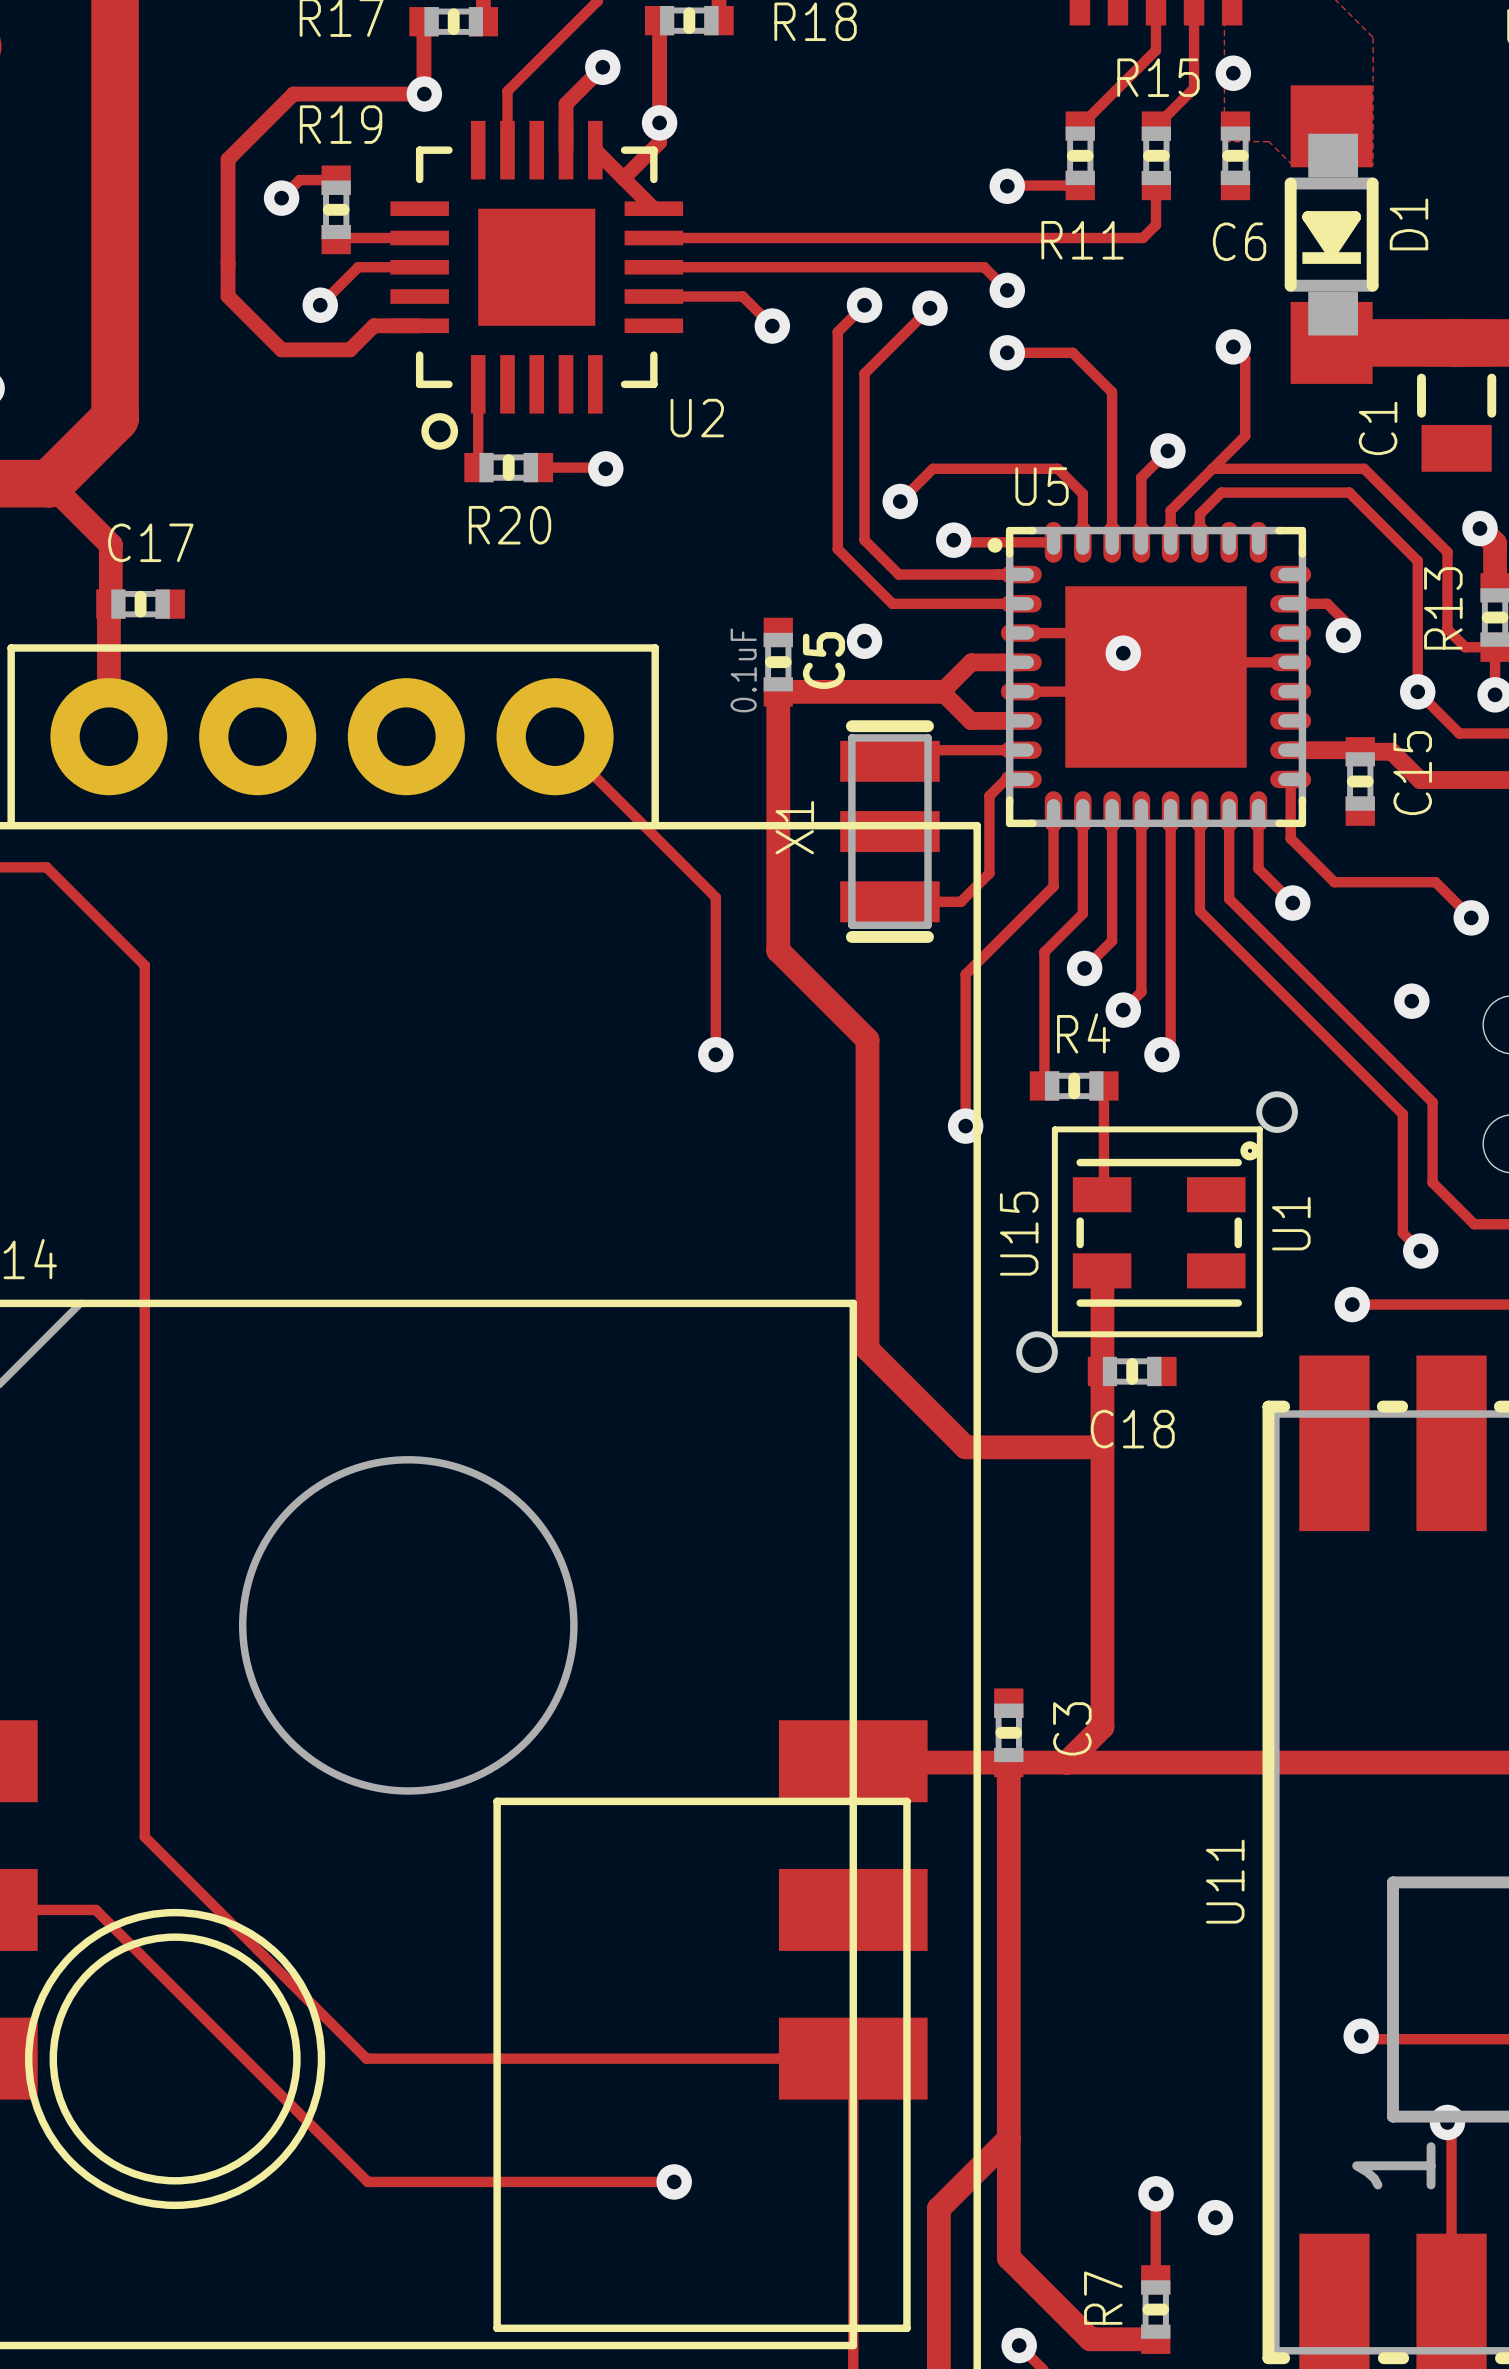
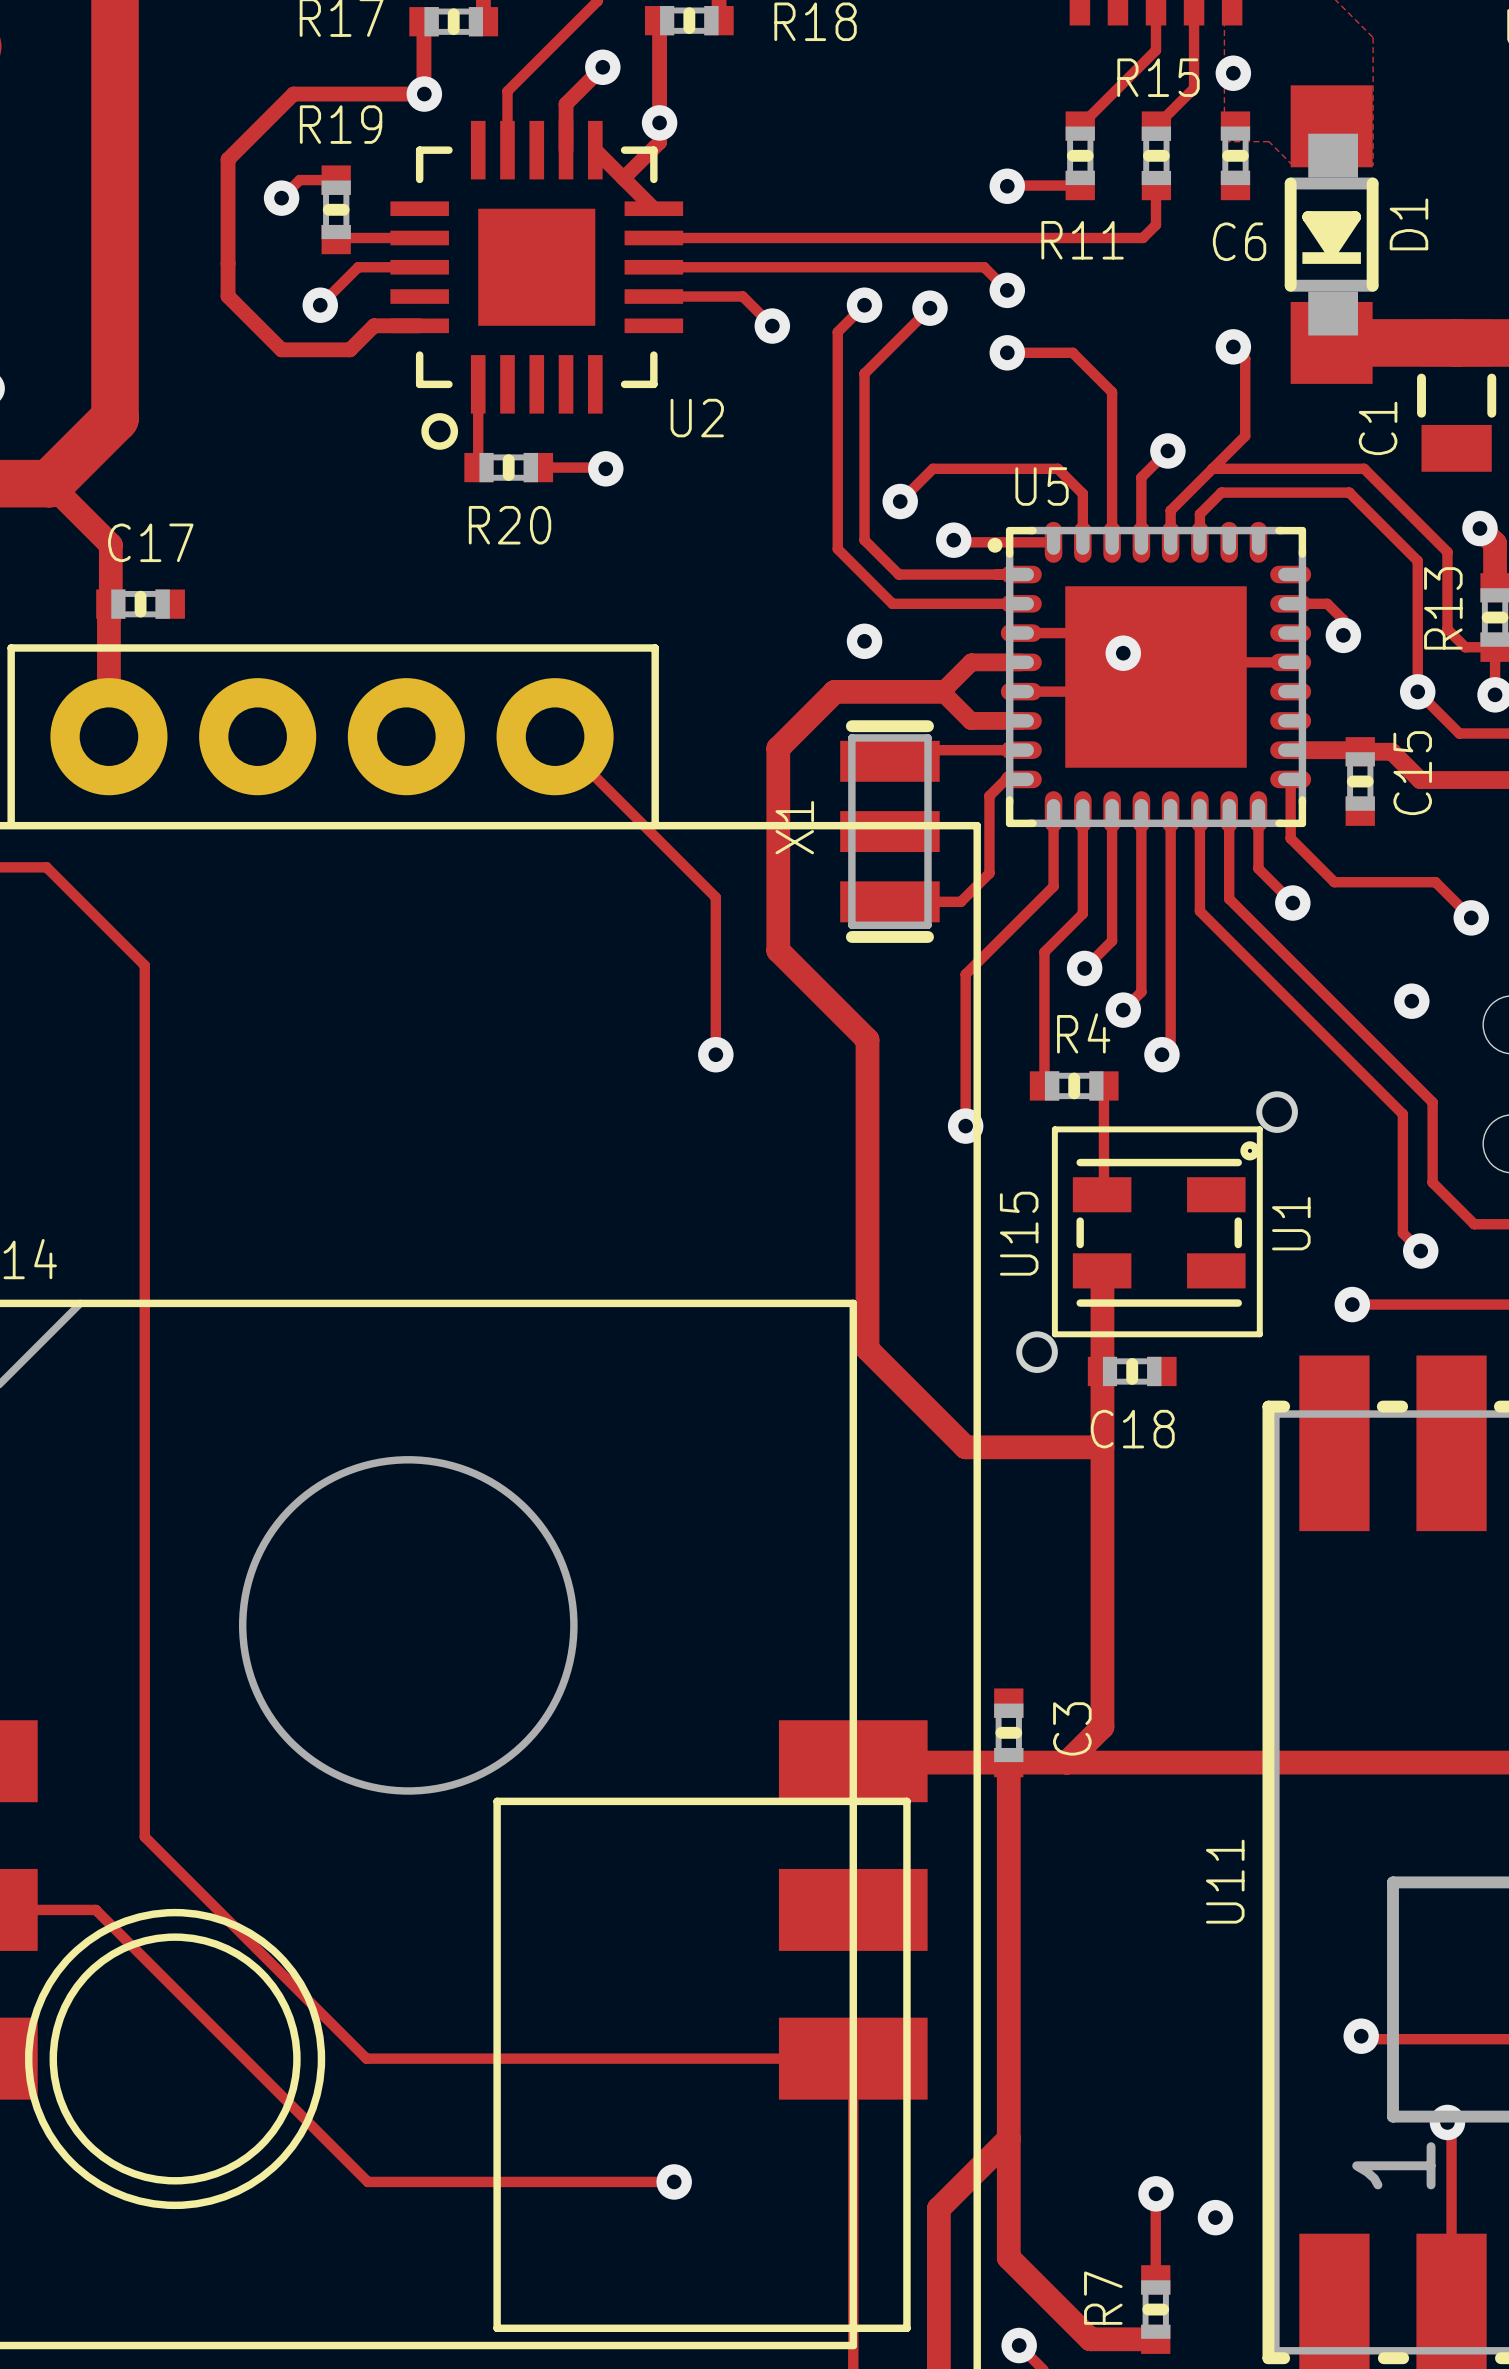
C5: 0.1uF (778, 662) -> none
track: (834, 691) (778, 691) (778, 748) -> (834, 691) (778, 748)

